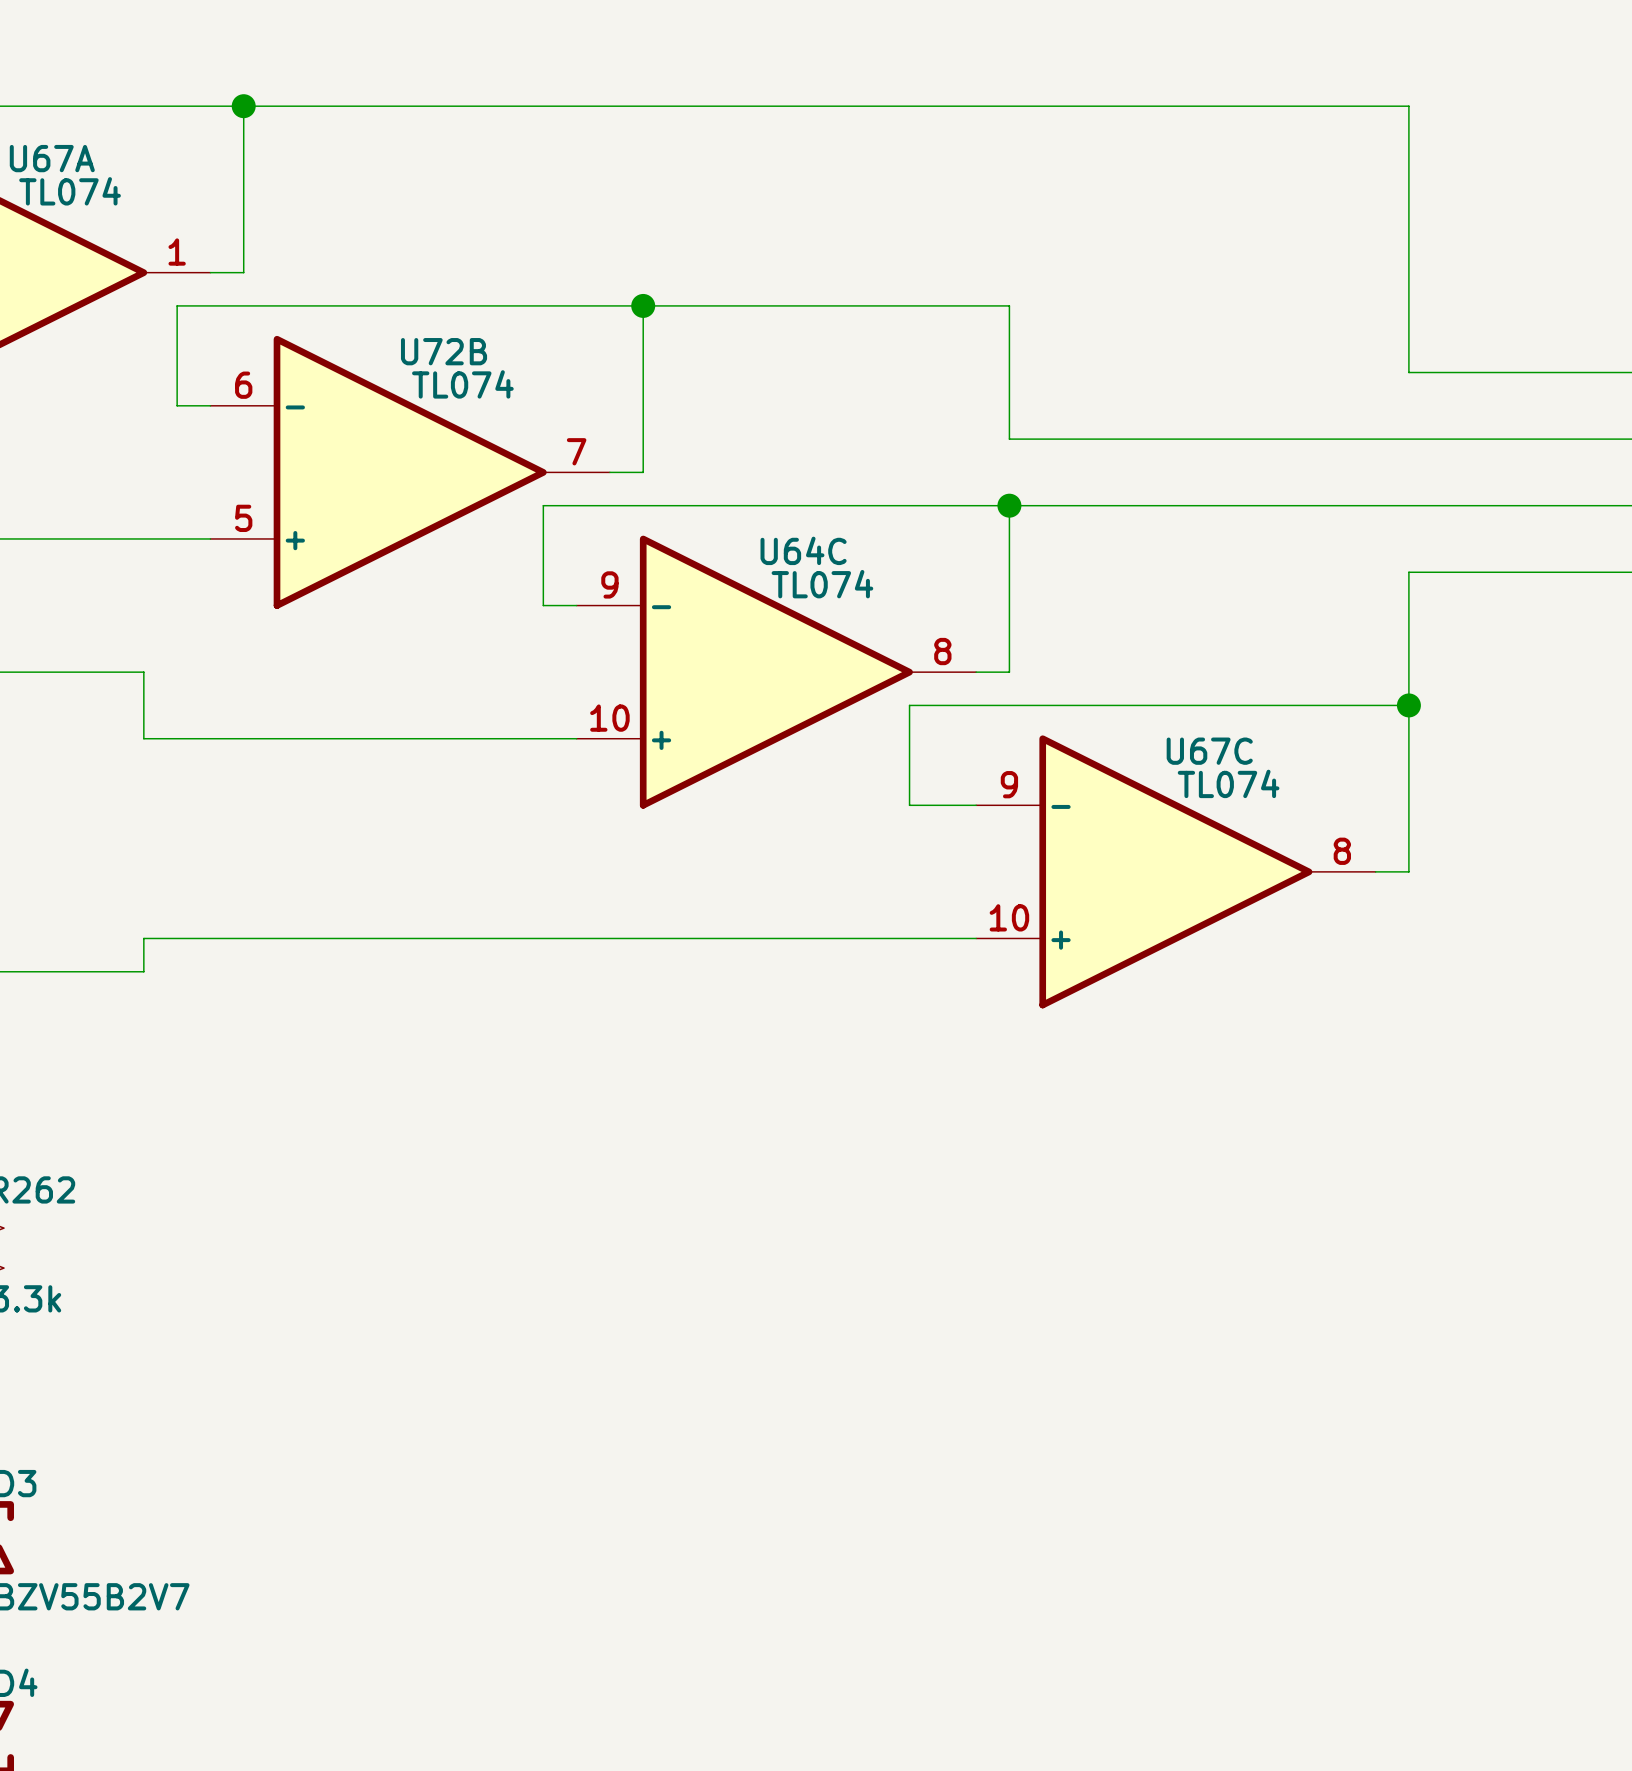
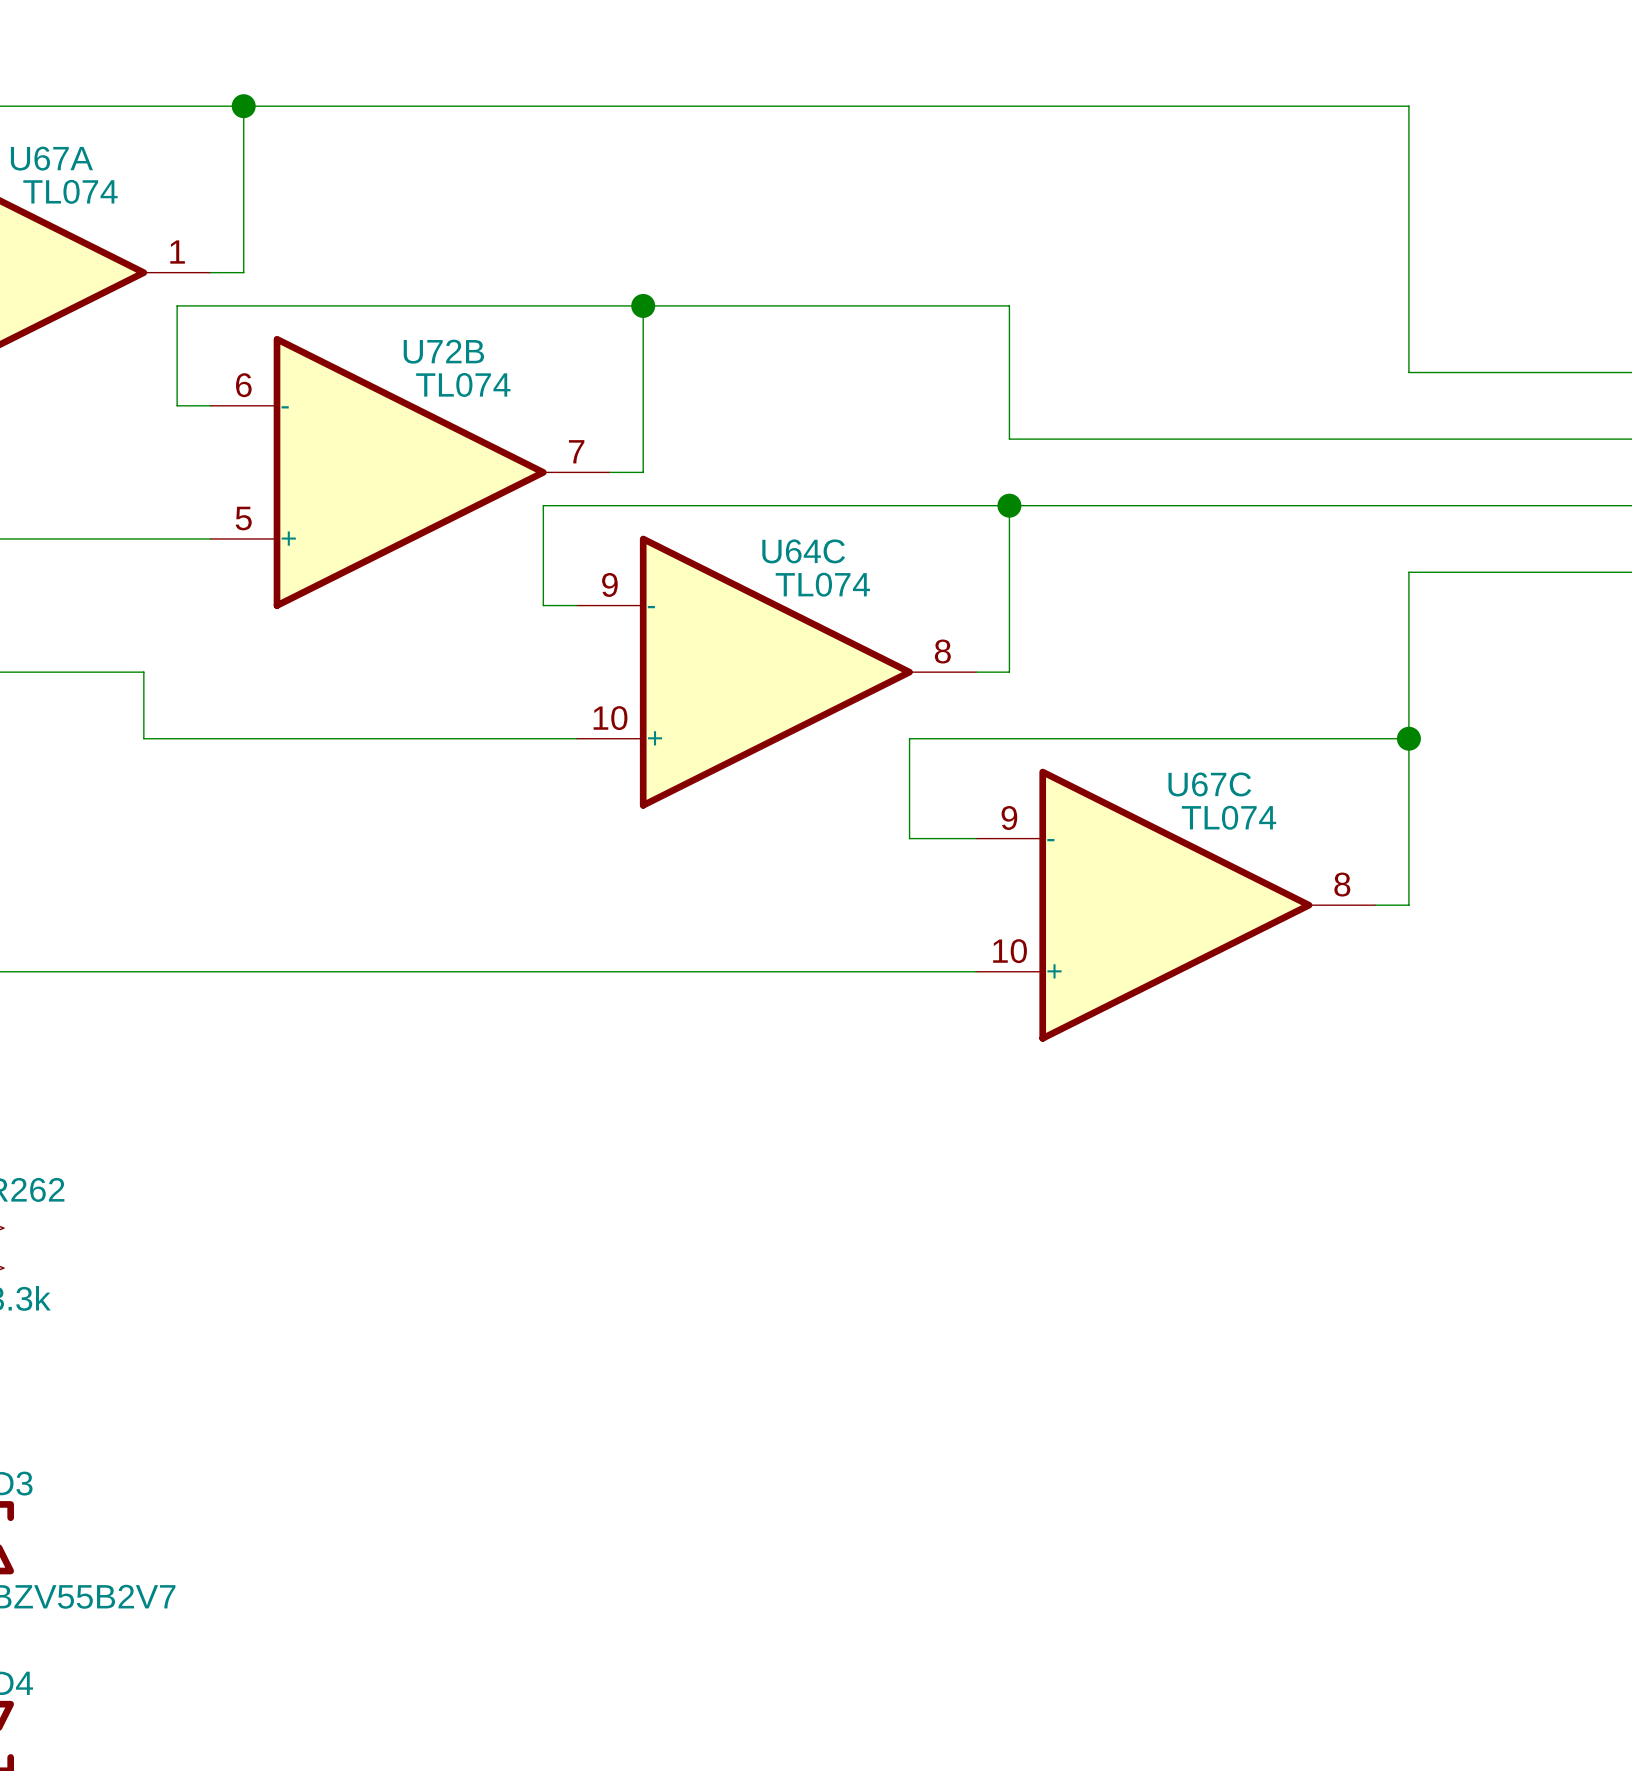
wire: (1408, 705) (909, 705) (909, 738) -> (1408, 738) (909, 738)
junction position: (1408, 705) -> (1408, 738)
wire: (909, 805) (976, 805) -> (909, 805) (909, 838) (976, 838)
U67C position: (1175, 871) -> (1175, 905)
wire: (1375, 871) (1408, 871) -> (1375, 905) (1408, 905) (1408, 871)
wire: (976, 938) (143, 938) (143, 971) -> (976, 971) (143, 971)

